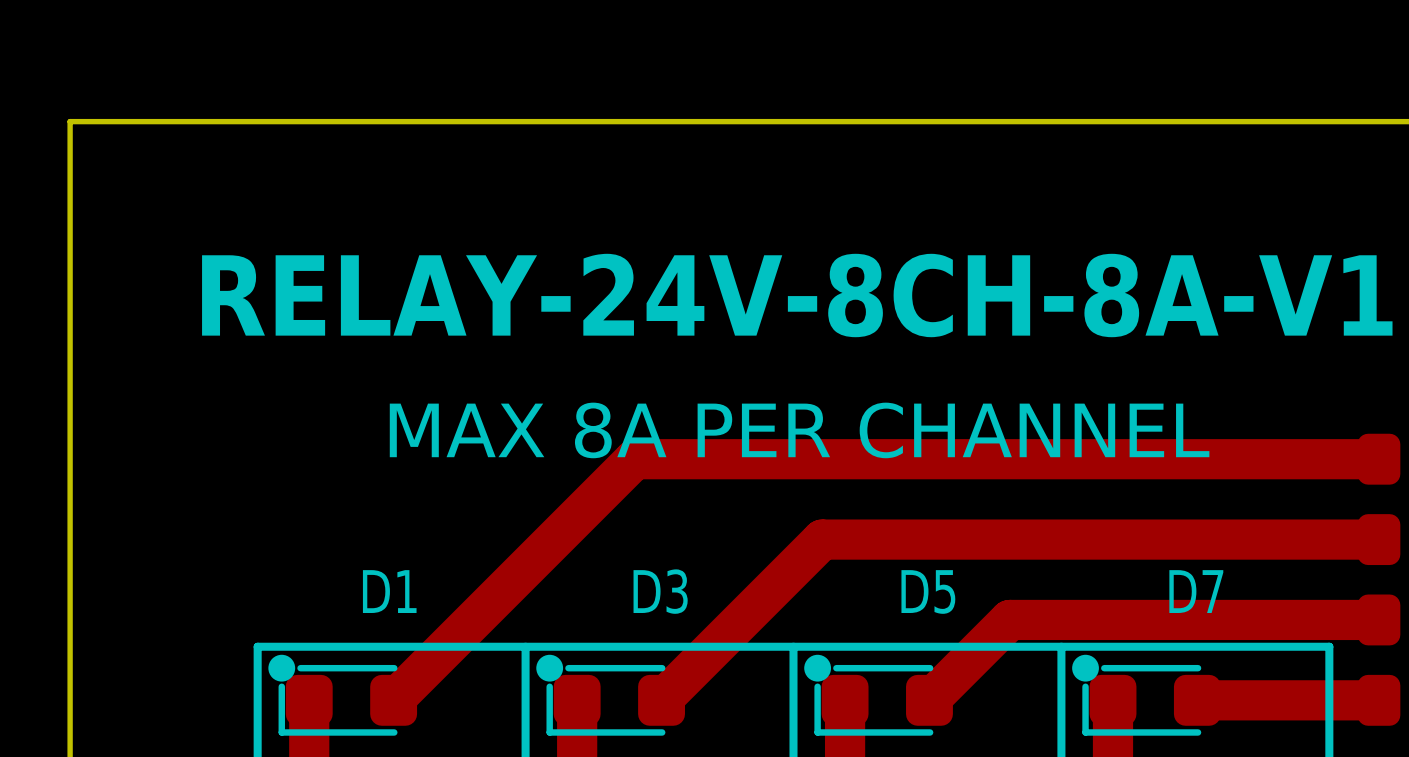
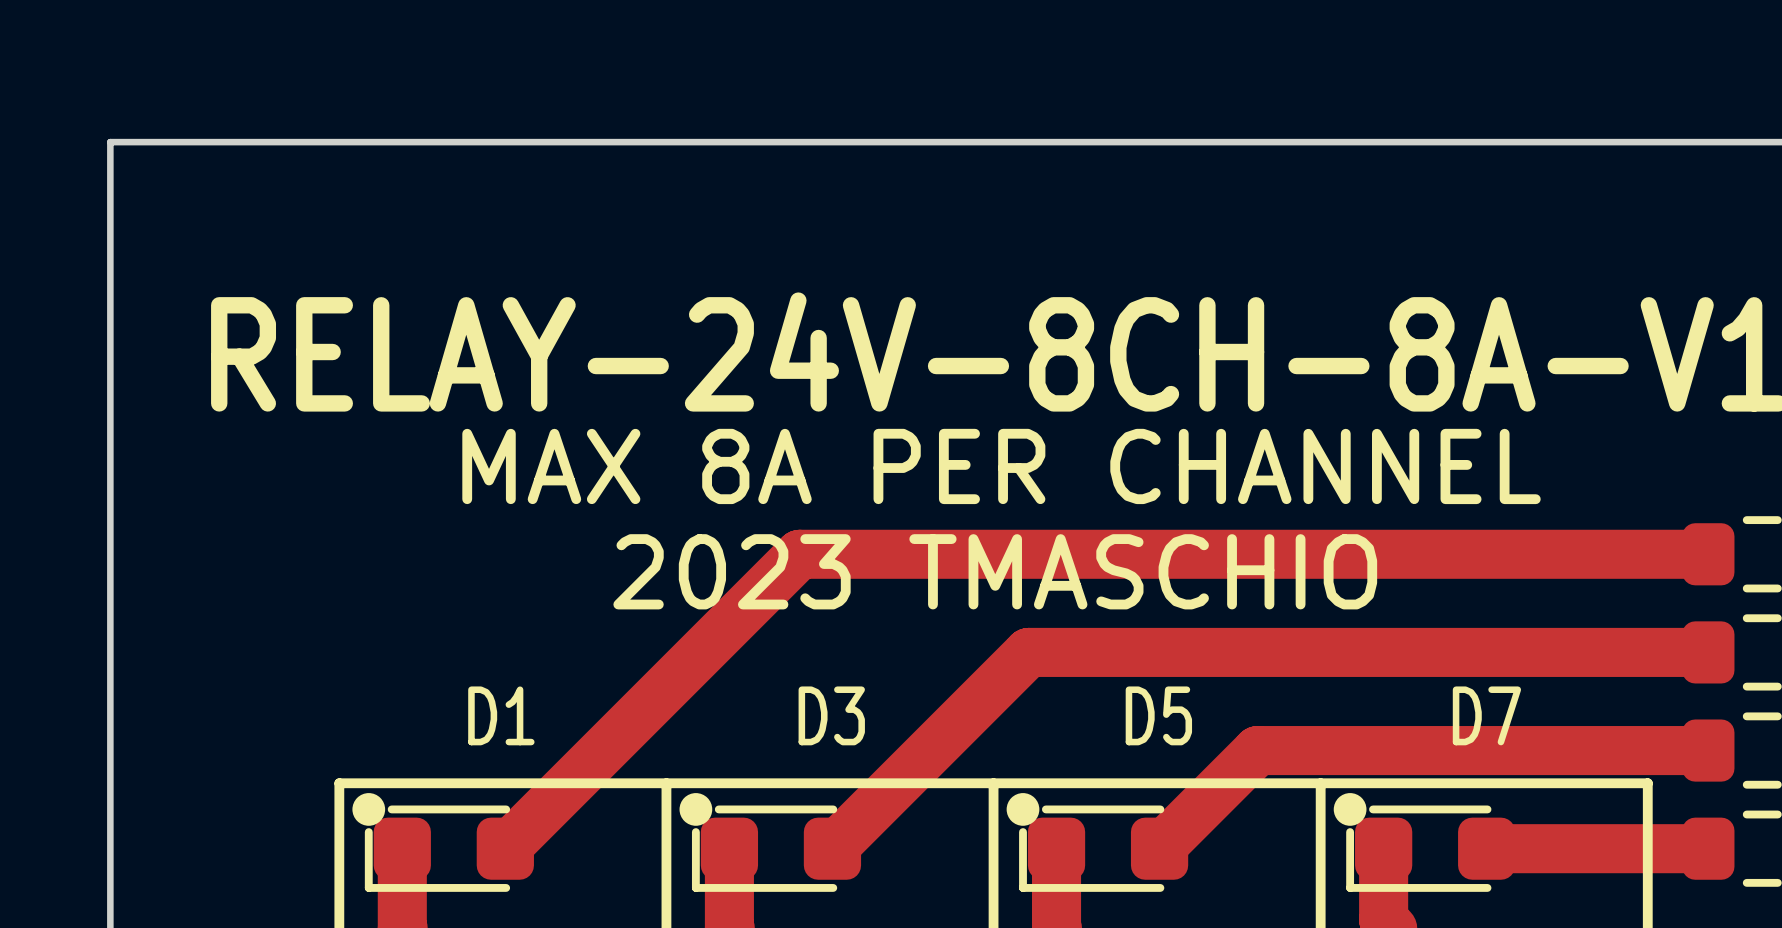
text position: MAX 8A PER CHANNEL (799, 430) -> MAX 8A PER CHANNEL (1001, 466)
text: none -> 2023 TMASCHIO (995, 571)

